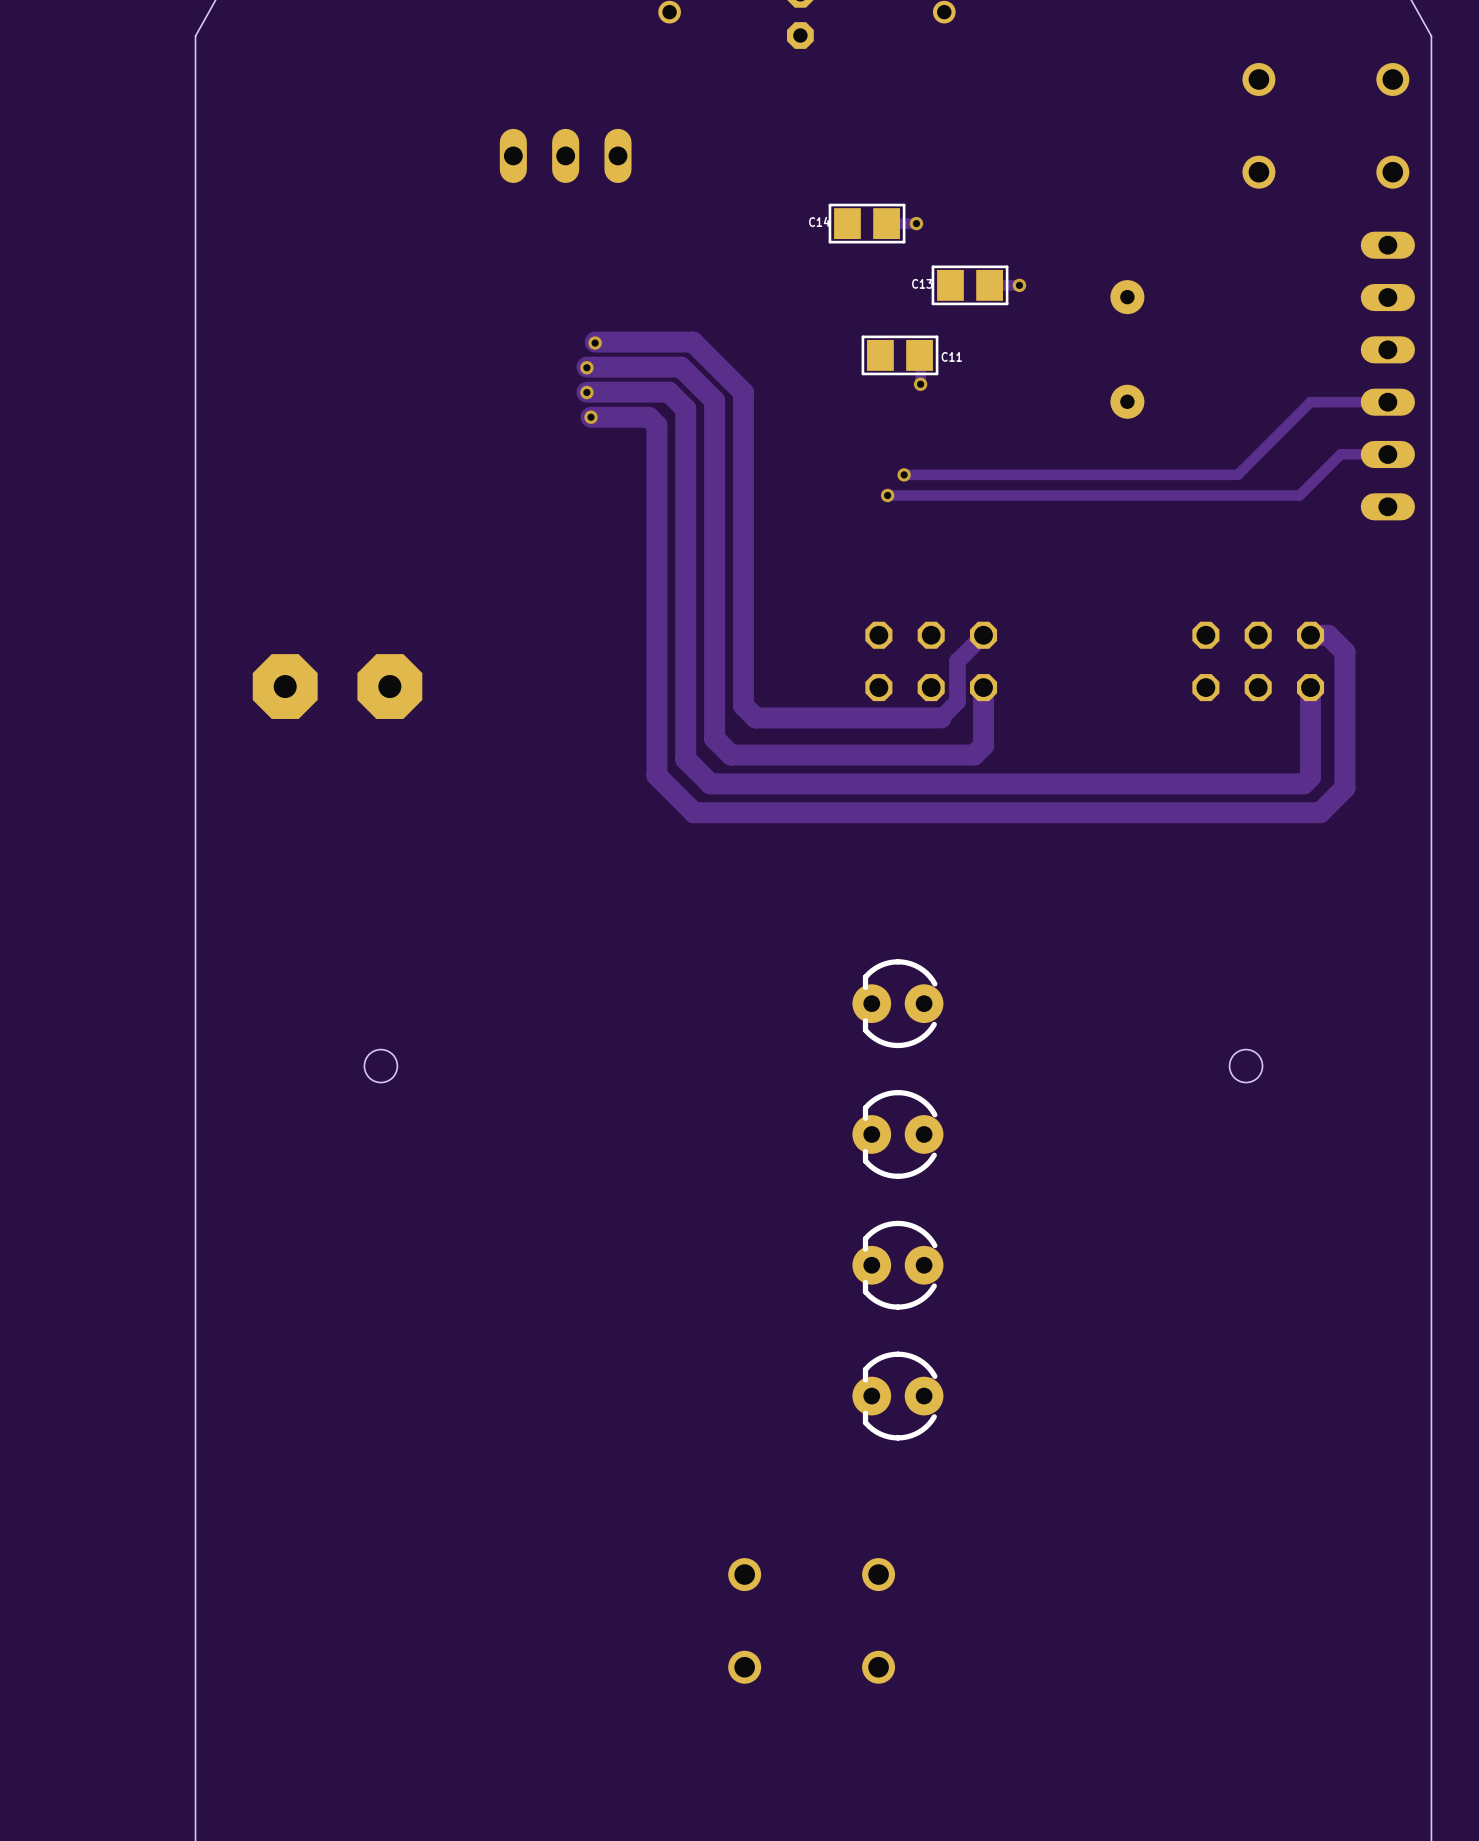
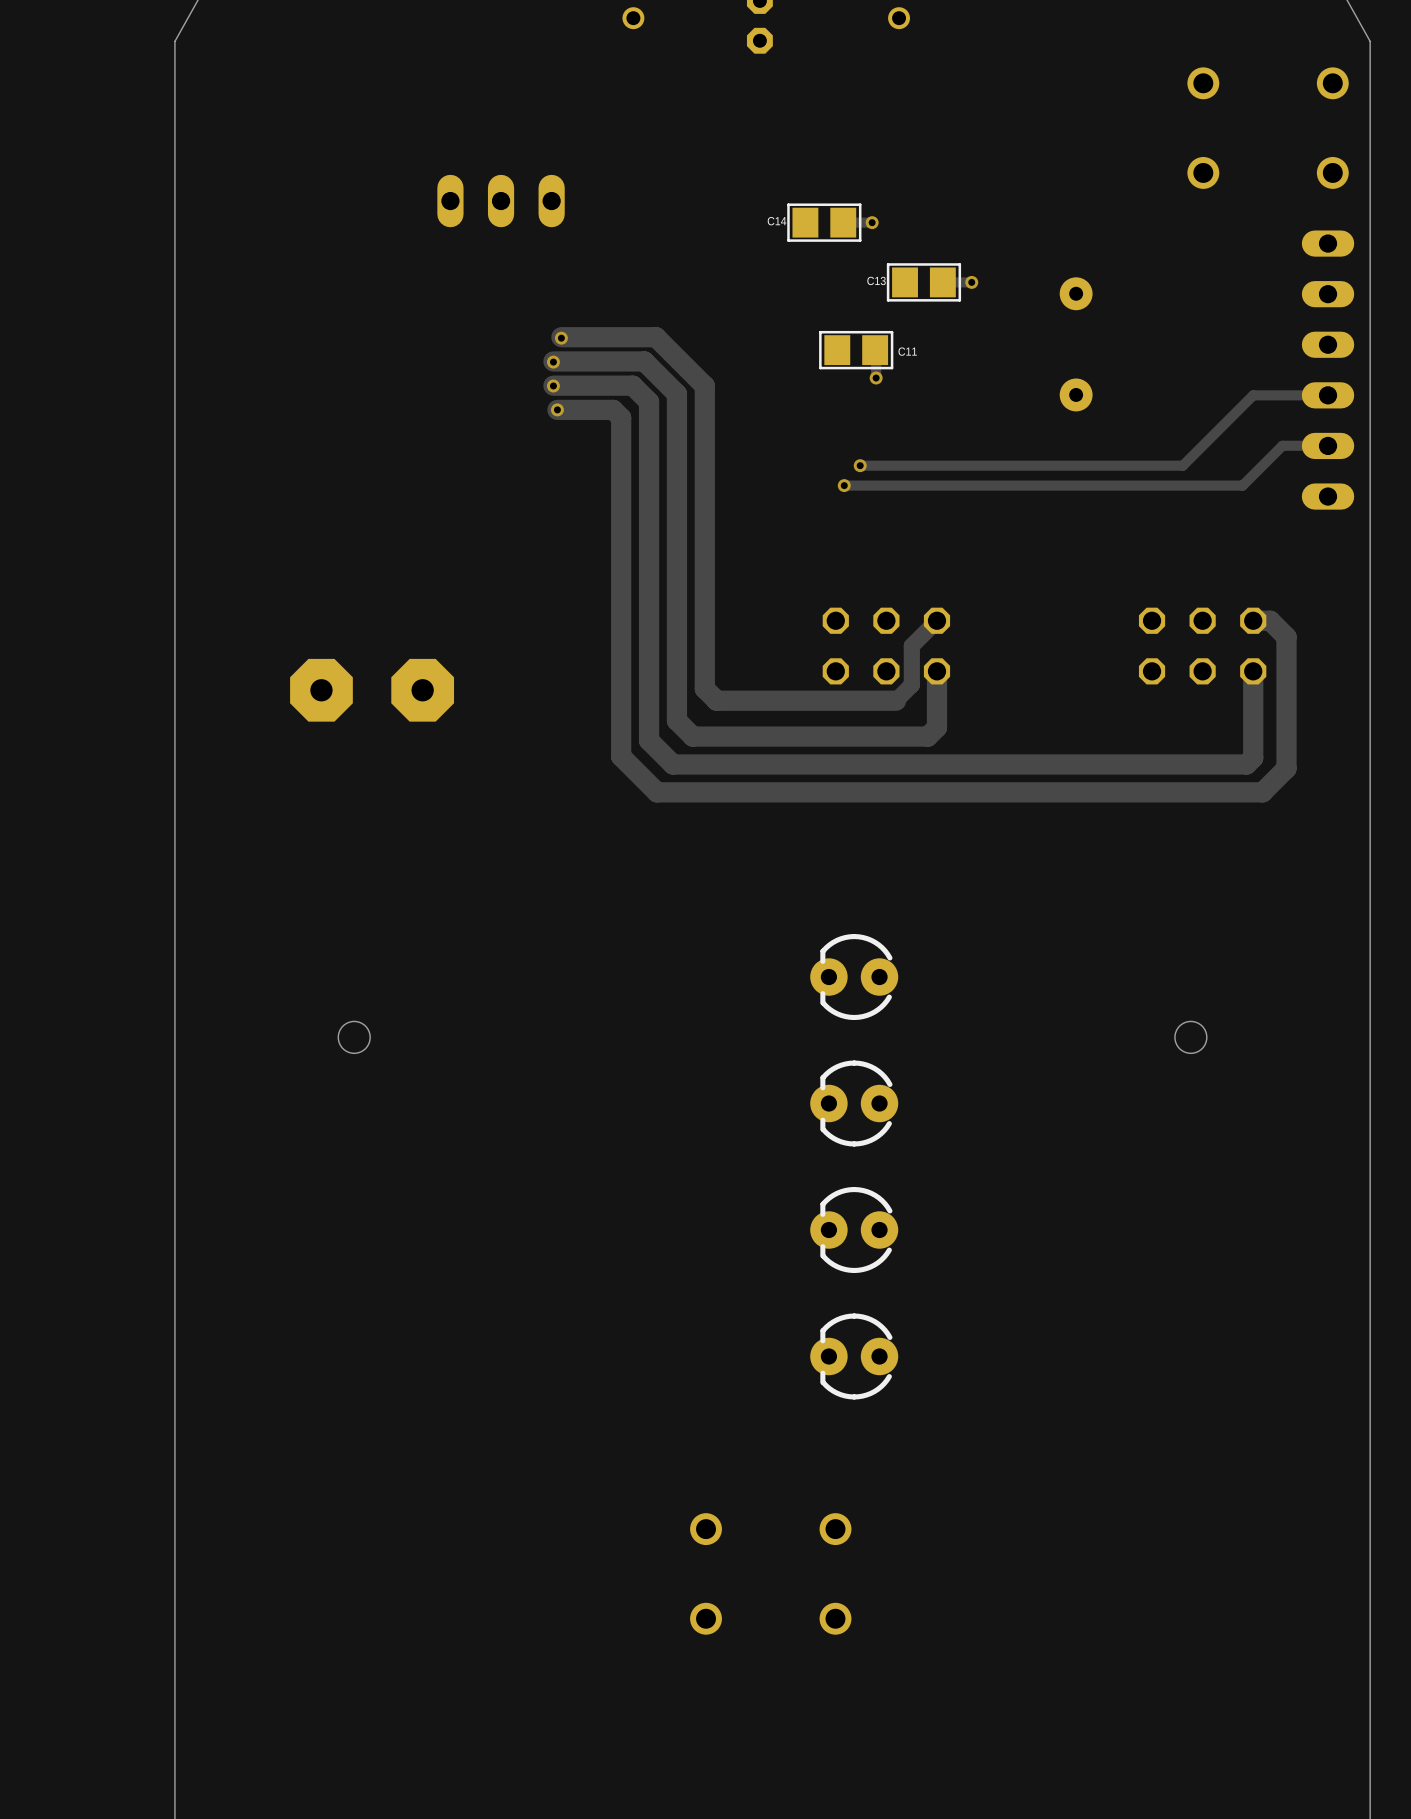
part position: (565, 155) -> (501, 201)
part position: (337, 686) -> (372, 690)

